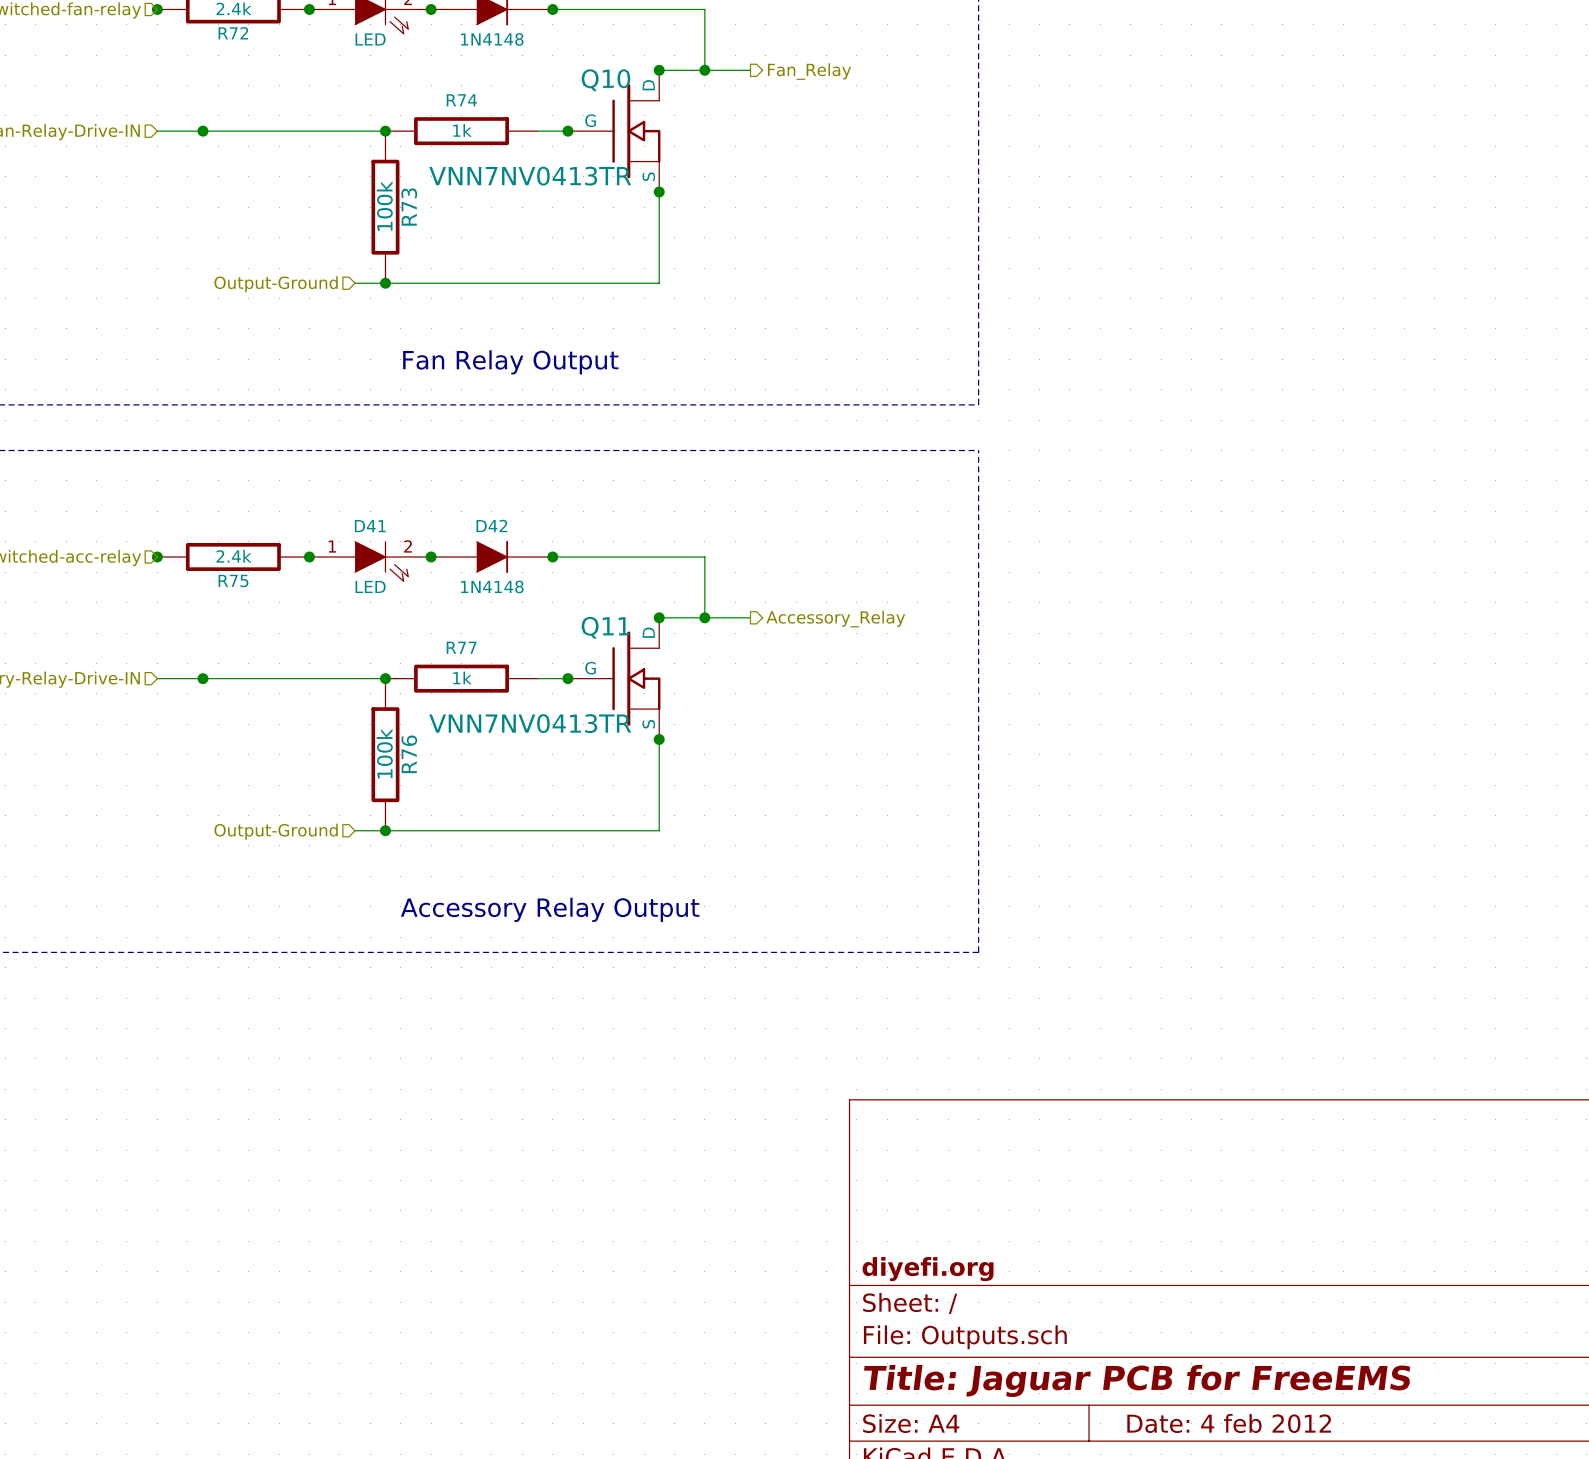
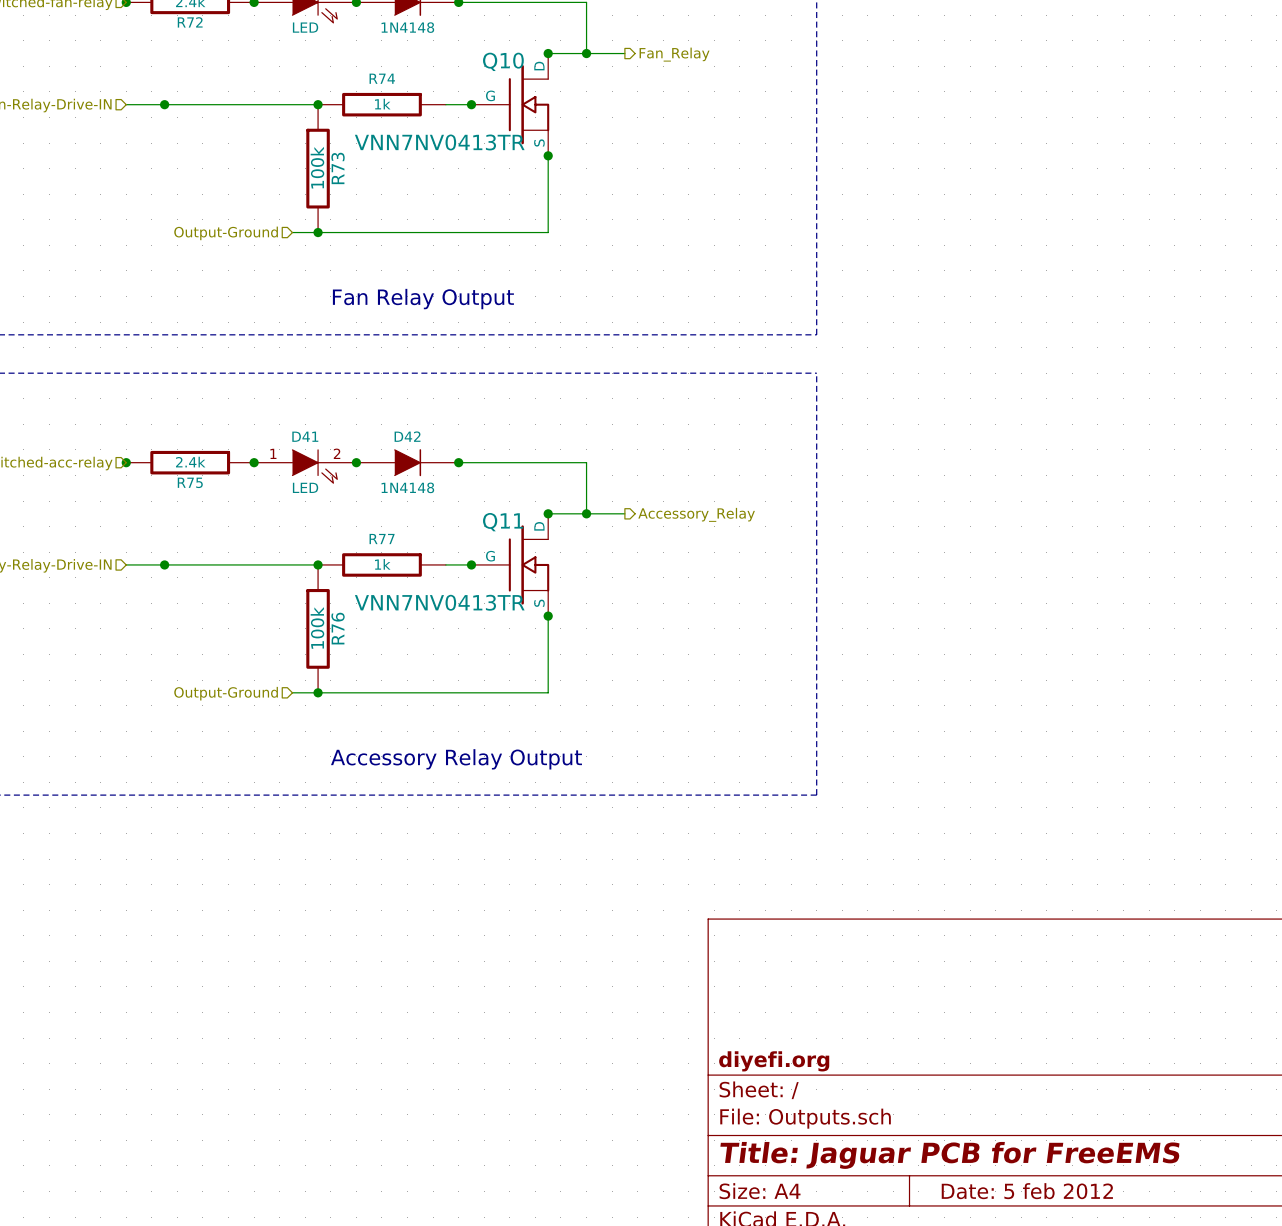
title block: Date: 4 feb 2012 (1229, 1423) -> Date: 5 feb 2012 (1027, 1191)

